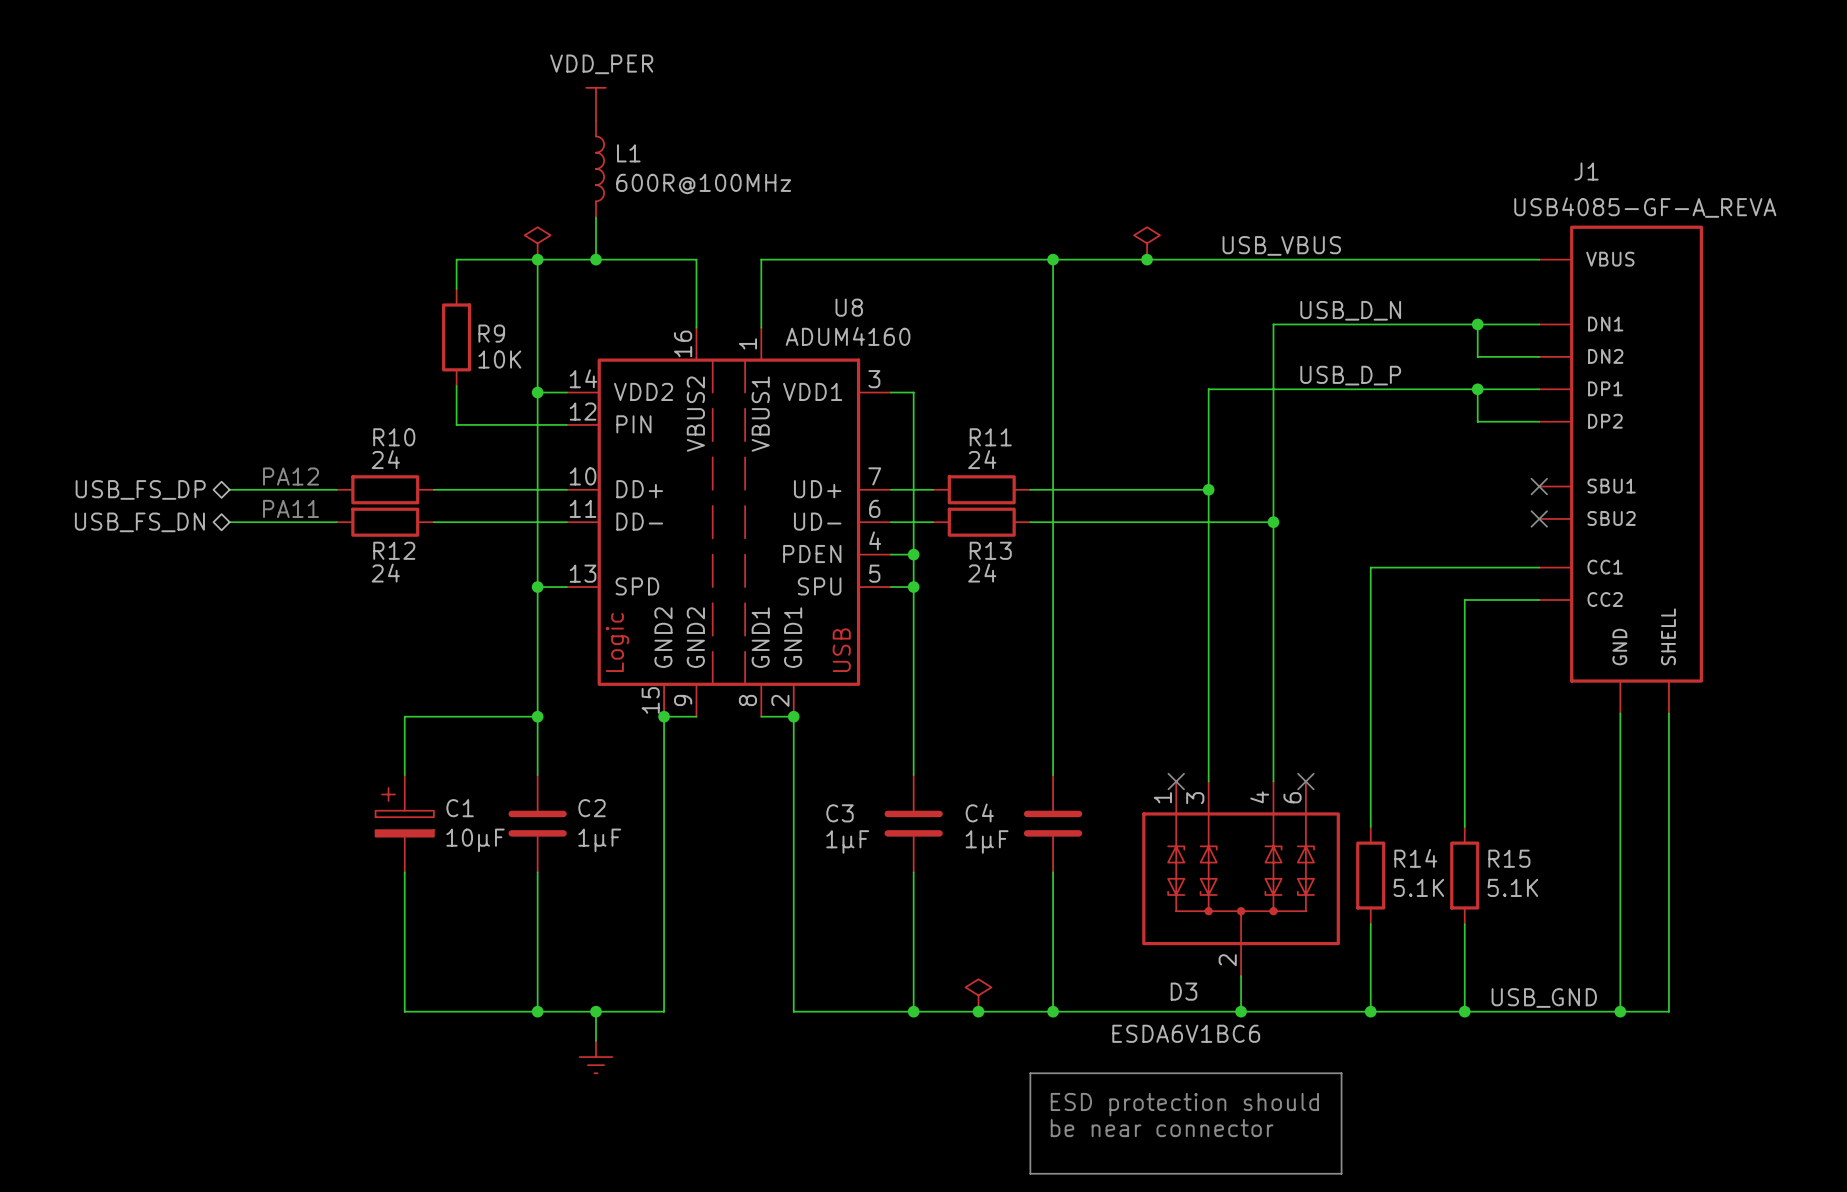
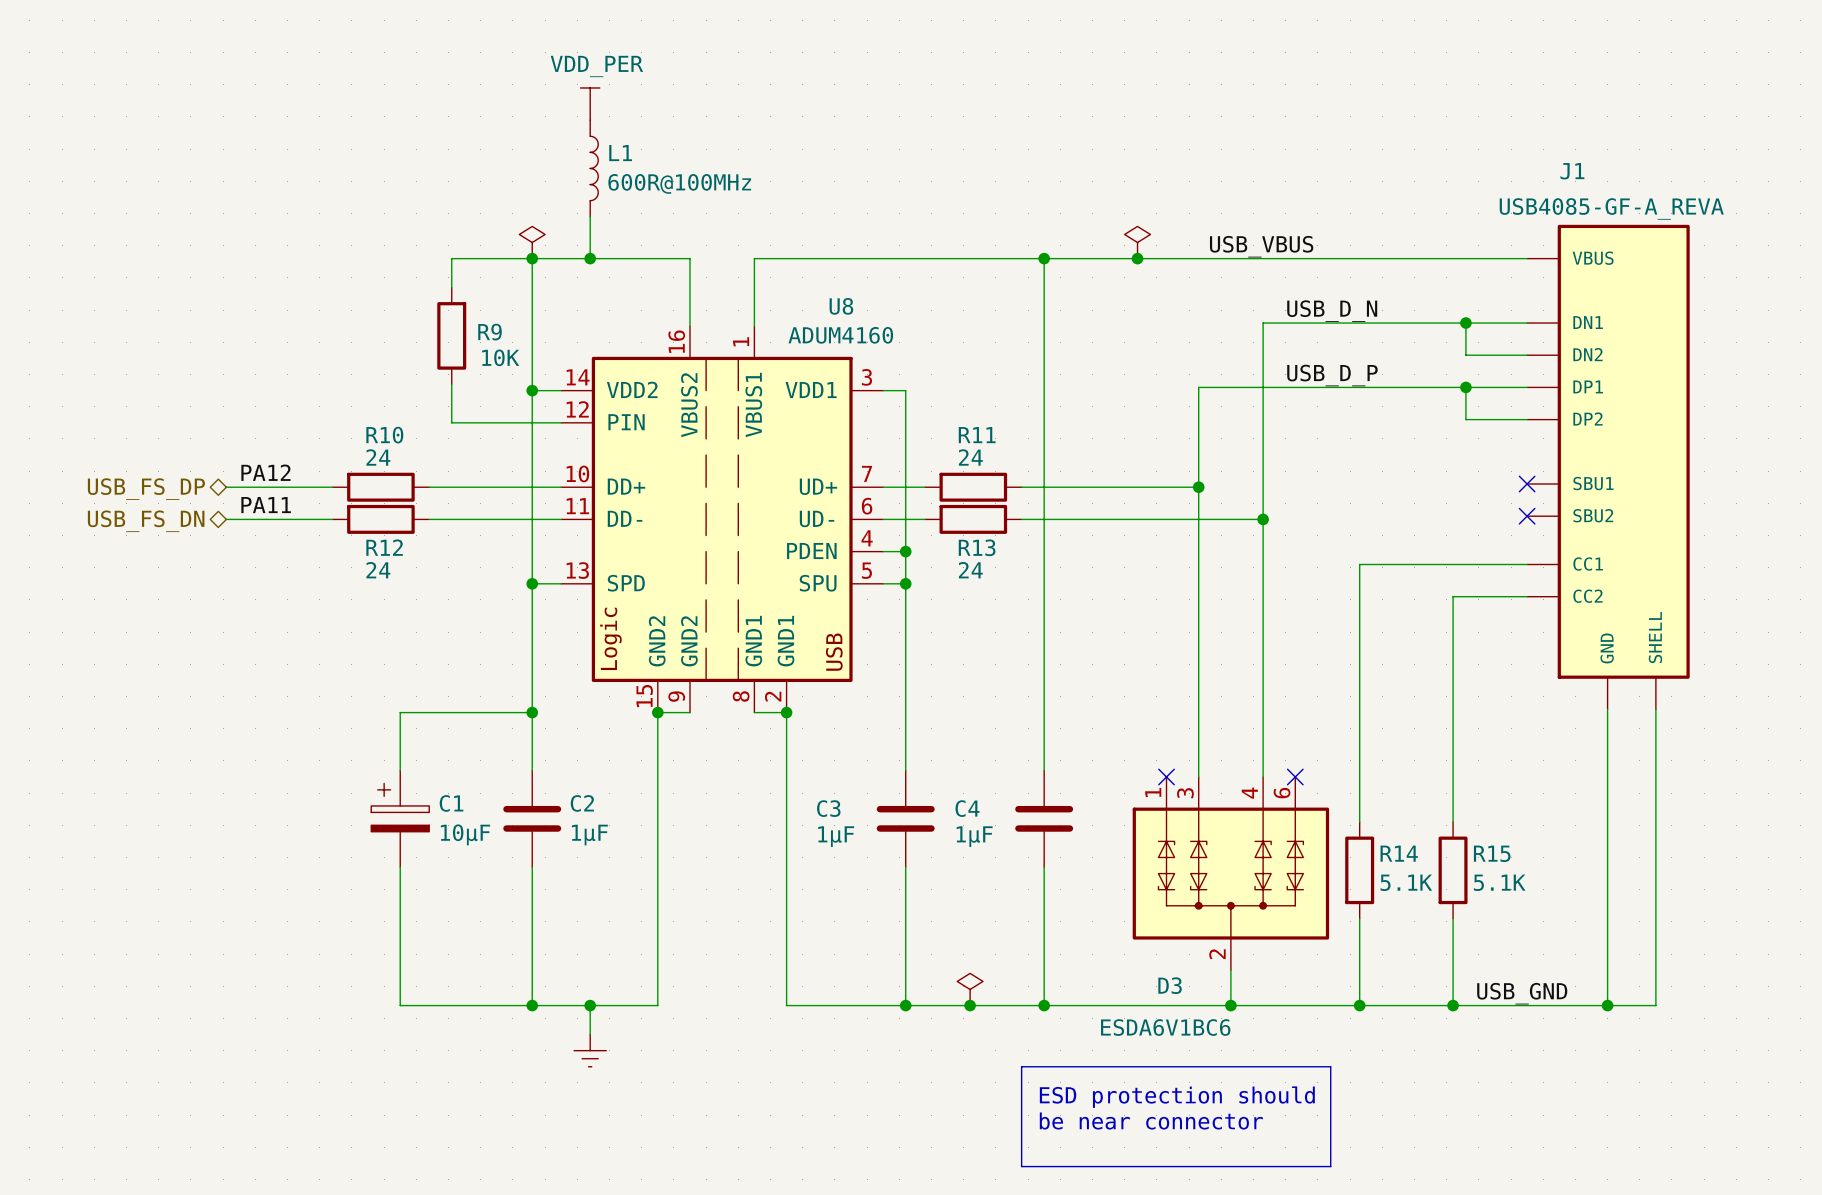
label: none -> PA12 (265, 472)
text: PA12 (291, 476) -> none
label: none -> PA11 (266, 505)
text: PA11 (291, 508) -> none

